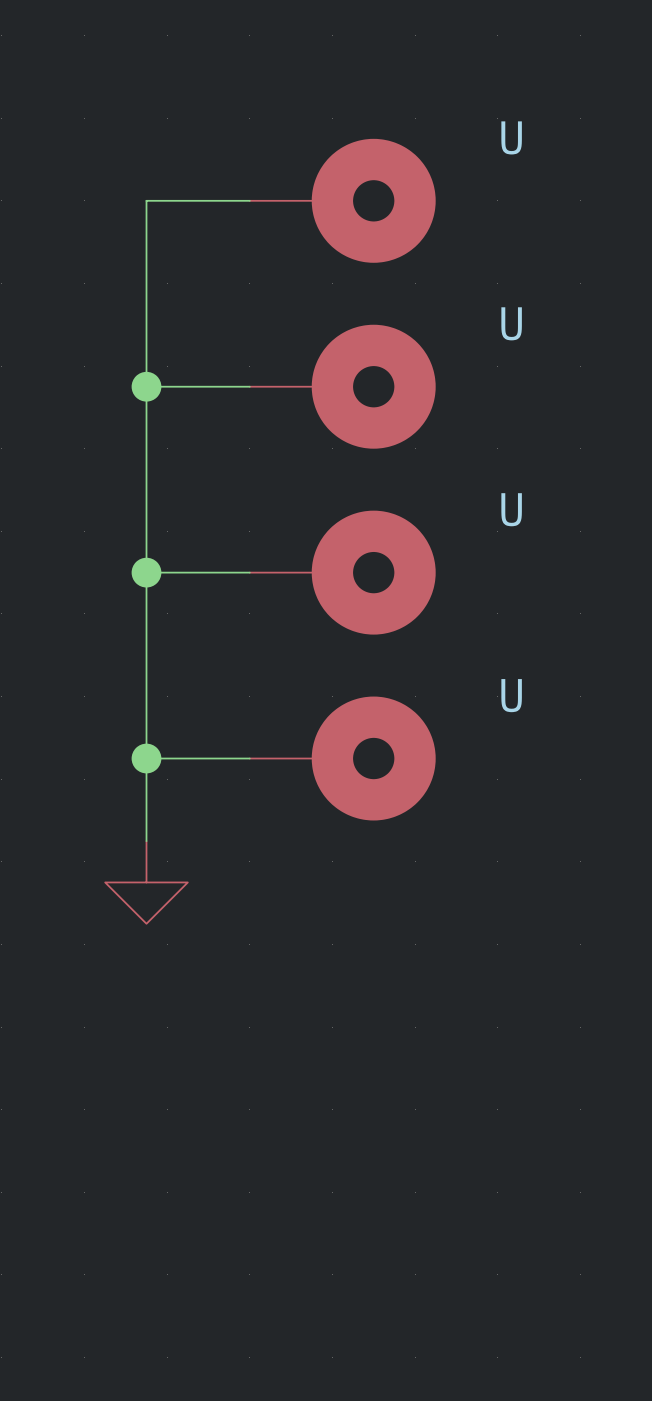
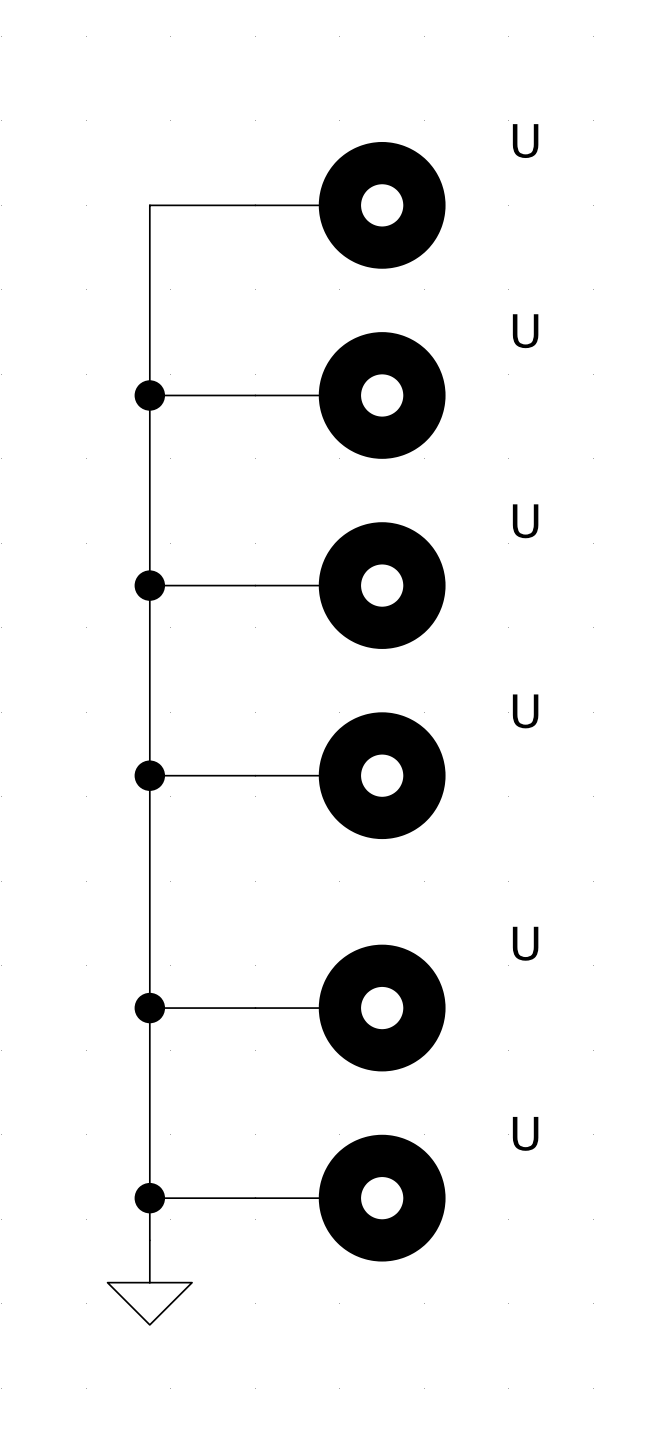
wire: none -> (149, 860) (149, 1240)
power symbol position: (146, 882) -> (149, 1282)
wire: none -> (149, 1008) (255, 1008)
junction: none -> (149, 1008)
U: none -> (350, 1008)
wire: none -> (149, 1198) (255, 1198)
junction: none -> (149, 1198)
U: none -> (350, 1198)

